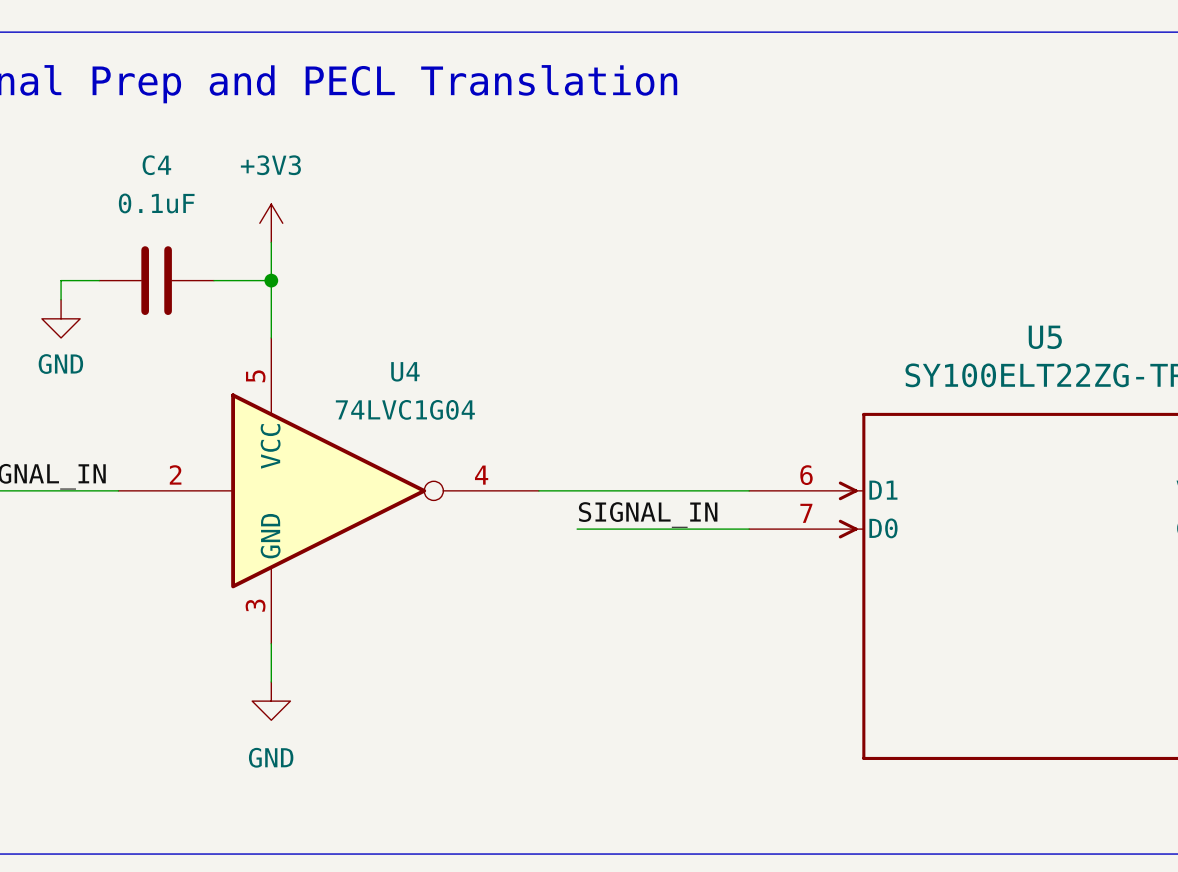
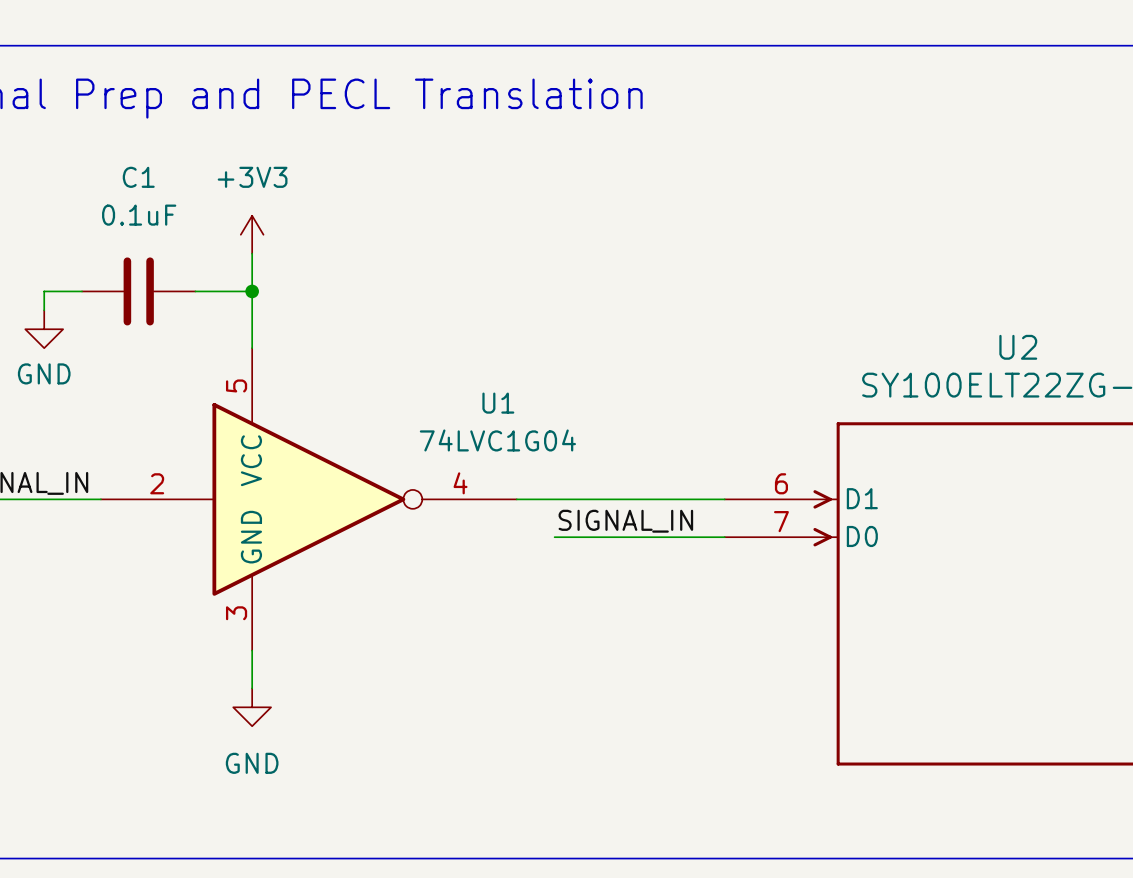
C4 name: C4 (156, 165) -> C1 (138, 177)
U5 name: U5 (1045, 337) -> U2 (1018, 347)
U4 name: U4 (405, 371) -> U1 (498, 403)
U4 value position: 74LVC1G04 (405, 409) -> 74LVC1G04 (497, 440)

